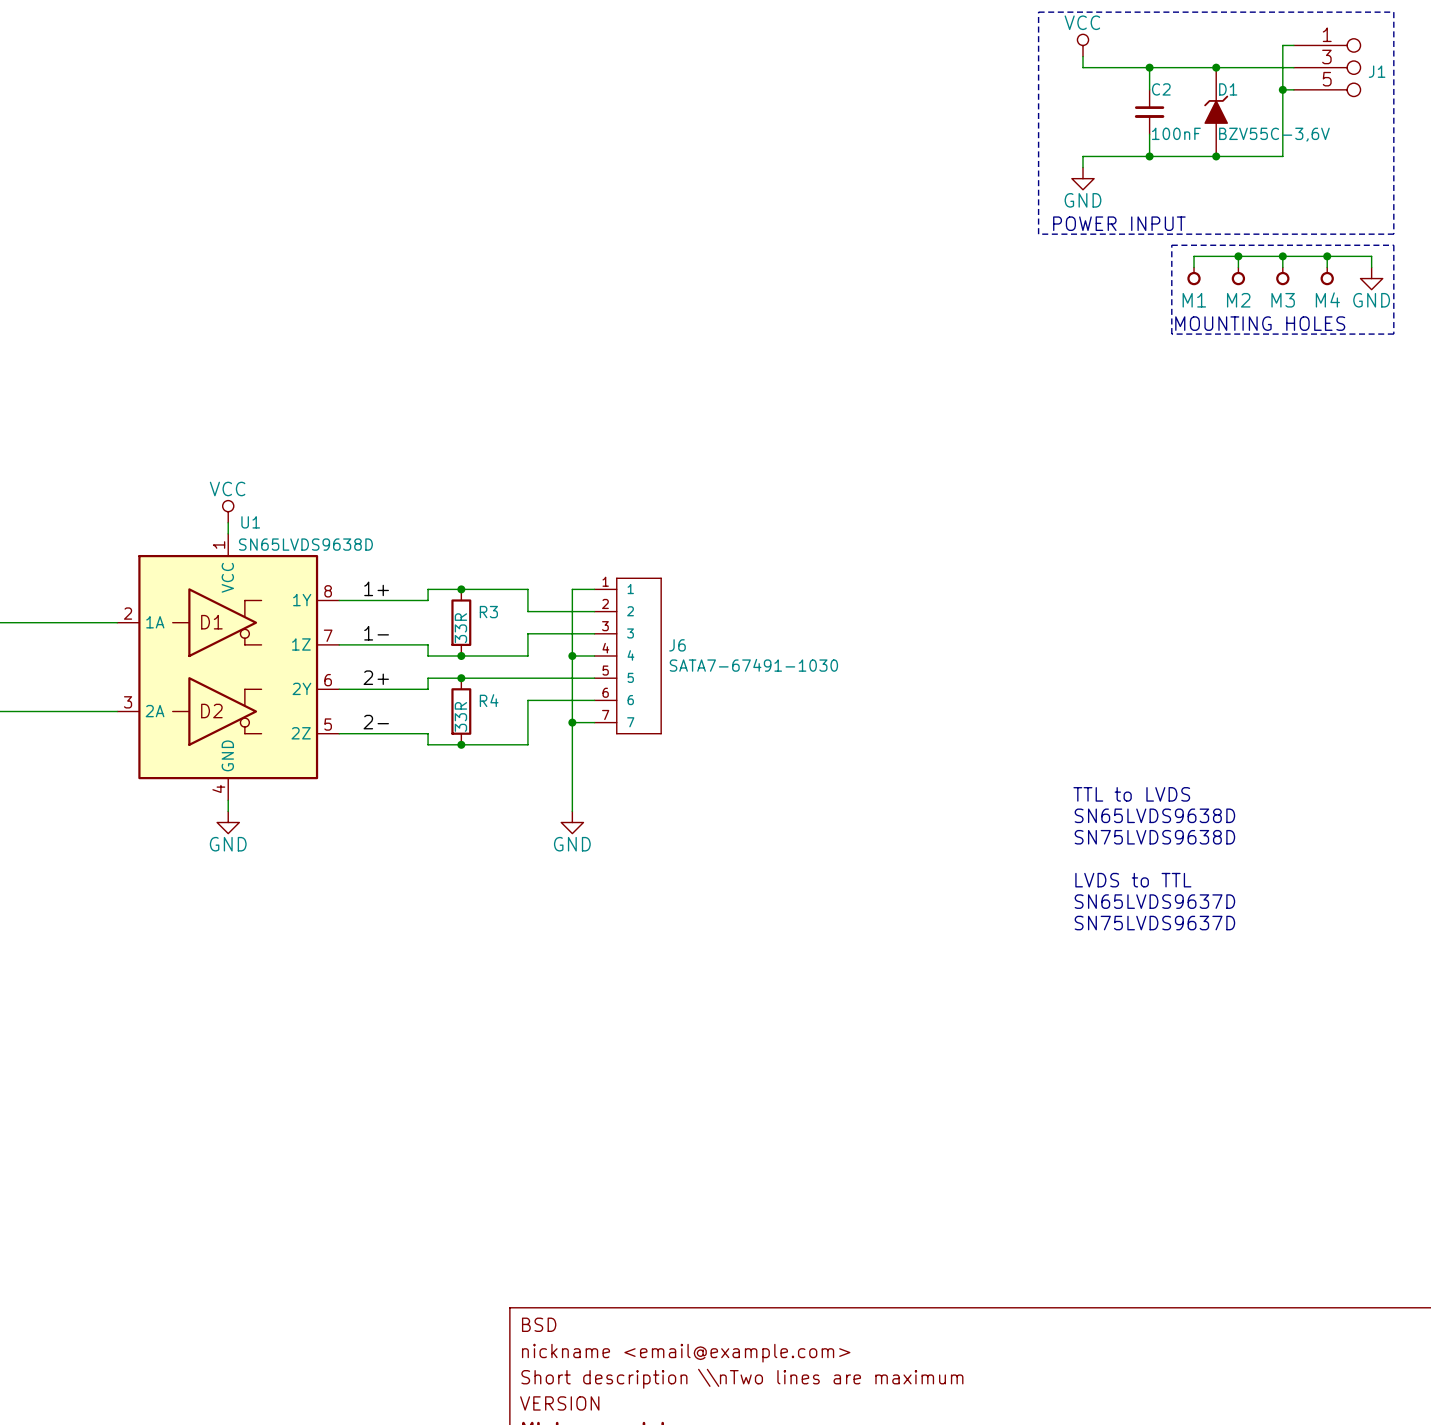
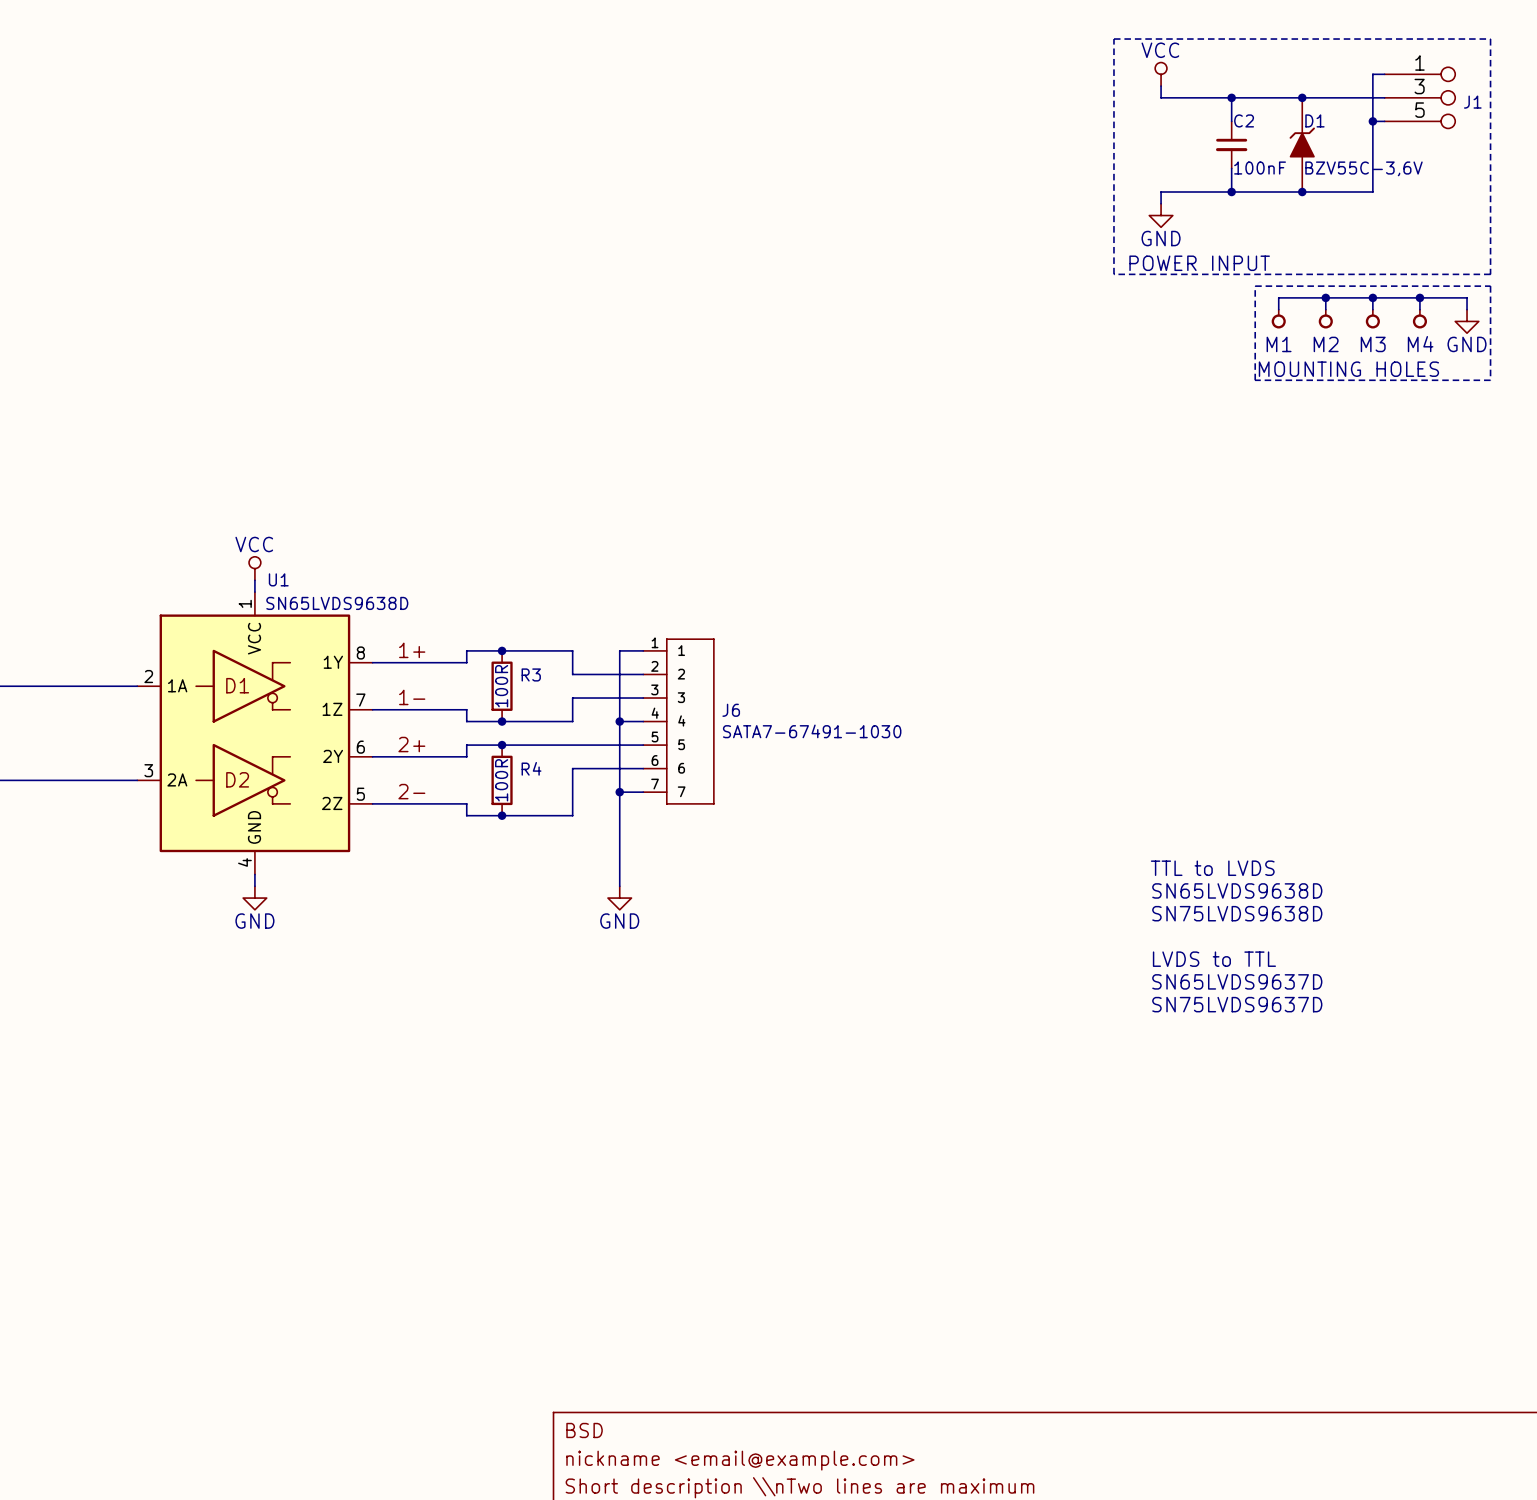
R3 value: 33R (460, 628) -> 100R (501, 686)
R4 value: 33R (460, 716) -> 100R (501, 780)

